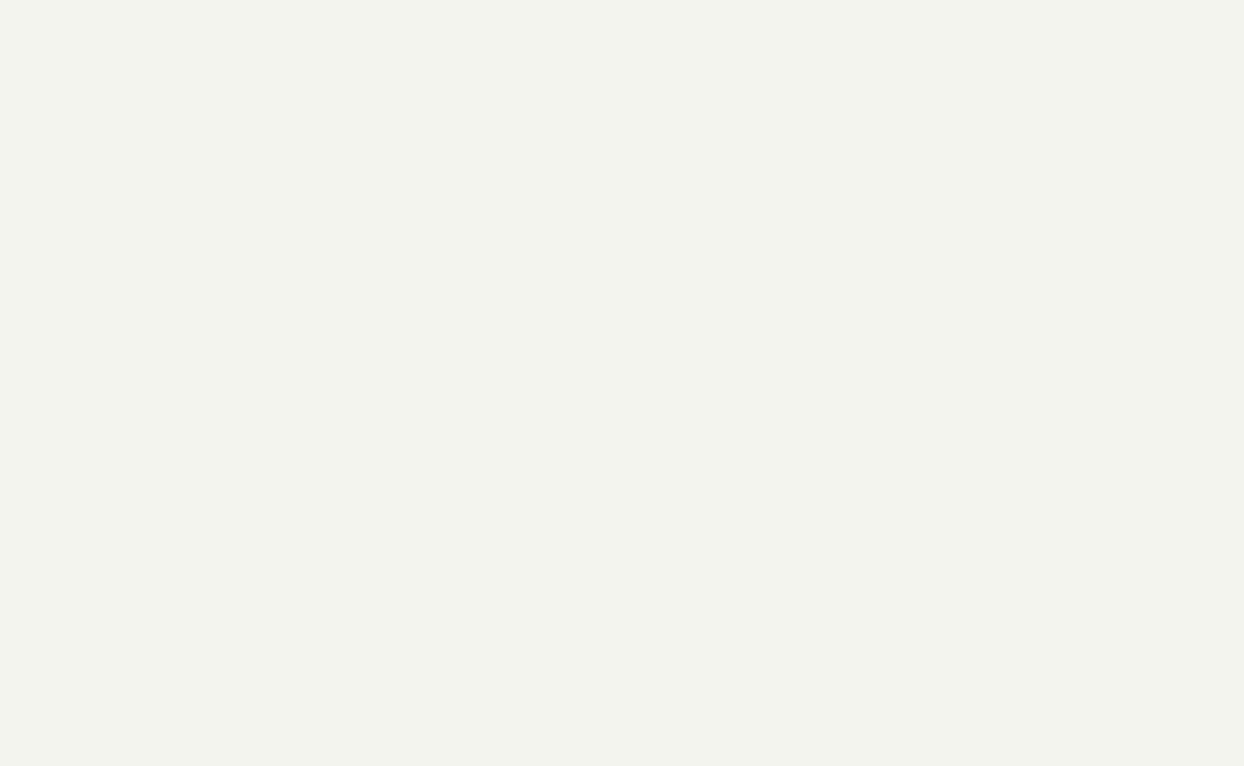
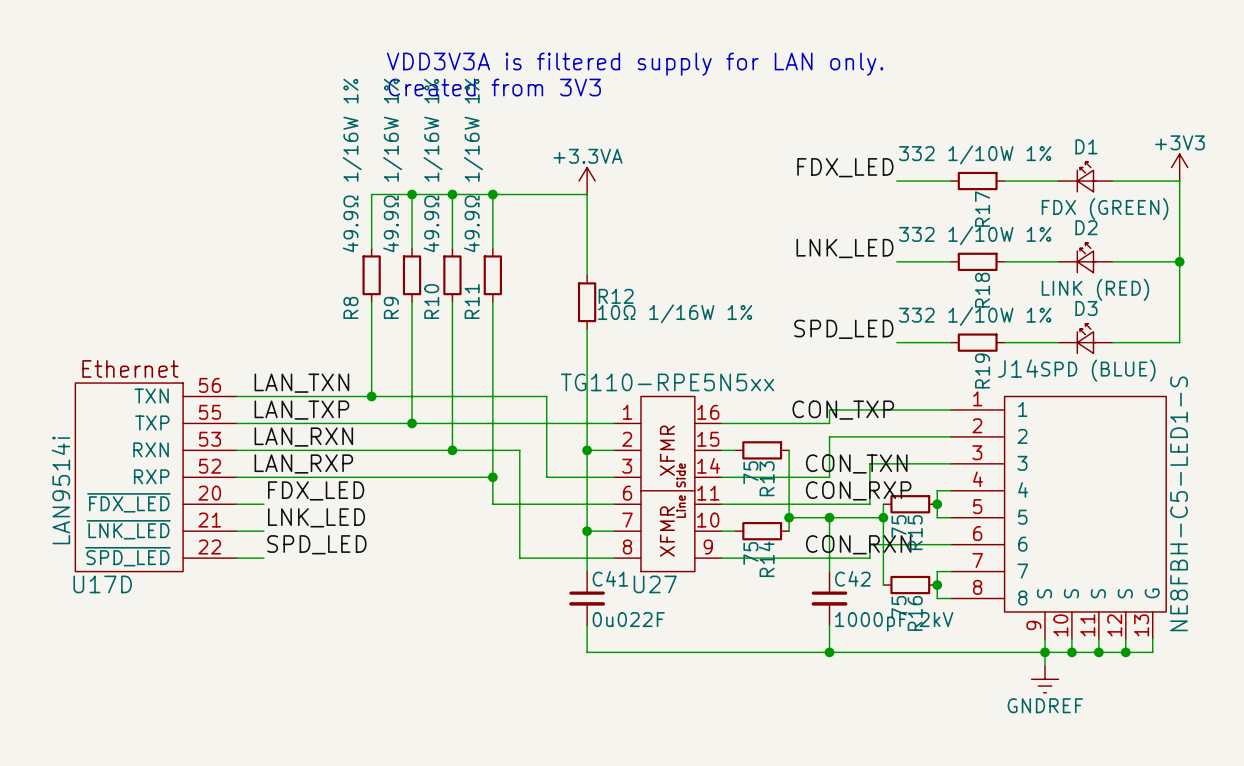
text: none -> VDD3V3A is filtered supply for LAN only. (635, 64)
text: none -> Created from 3V3 (494, 87)
label: none -> FDX_LED (845, 167)
power symbol: none -> +3V3 (1179, 167)
D1: none -> FDX (GREEN) (1085, 176)
power symbol: none -> +3.3VA (587, 181)
wire: none -> (896, 181) (950, 181)
R17: none -> 332 1/10W 1% (977, 181)
wire: none -> (1004, 181) (1058, 181)
wire: none -> (1112, 181) (1179, 181) (1179, 342) (1112, 342)
wire: none -> (412, 194) (412, 248)
junction: none -> (412, 194)
wire: none -> (452, 194) (452, 248)
junction: none -> (452, 194)
wire: none -> (492, 194) (492, 248)
junction: none -> (492, 194)
wire: none -> (371, 248) (371, 194) (587, 194) (587, 275)
label: none -> LNK_LED (845, 248)
D2: none -> LINK (RED) (1085, 257)
wire: none -> (896, 261) (950, 261)
R18: none -> 332 1/10W 1% (977, 261)
wire: none -> (1004, 261) (1058, 261)
wire: none -> (1112, 261) (1179, 261)
junction: none -> (1179, 261)
R8: none -> 49.9Ω 1/16W 1% (371, 275)
R9: none -> 49.9Ω 1/16W 1% (412, 275)
R10: none -> 49.9Ω 1/16W 1% (452, 275)
R11: none -> 49.9Ω 1/16W 1% (492, 275)
wire: none -> (371, 302) (371, 396)
wire: none -> (412, 302) (412, 423)
wire: none -> (452, 302) (452, 450)
wire: none -> (492, 302) (492, 504) (614, 504)
R12: none -> 10Ω 1/16W 1% (587, 302)
wire: none -> (587, 329) (587, 571)
label: none -> SPD_LED (843, 329)
D3: none -> SPD (BLUE) (1085, 338)
wire: none -> (896, 342) (950, 342)
R19: none -> 332 1/10W 1% (977, 342)
wire: none -> (1004, 342) (1058, 342)
label: none -> LAN_TXN (301, 383)
wire: none -> (236, 396) (546, 396) (546, 477) (614, 477)
junction: none -> (371, 396)
wire: none -> (950, 409) (829, 409) (829, 423) (721, 423)
label: none -> LAN_TXP (301, 410)
label: none -> CON_TXP (843, 410)
wire: none -> (236, 423) (614, 423)
junction: none -> (412, 423)
wire: none -> (950, 436) (829, 436) (829, 477) (721, 477)
label: none -> LAN_RXN (303, 437)
wire: none -> (236, 450) (519, 450) (519, 558) (614, 558)
junction: none -> (452, 450)
wire: none -> (587, 450) (614, 450)
junction: none -> (587, 450)
wire: none -> (721, 450) (735, 450)
R13: none -> 75 (762, 450)
wire: none -> (789, 450) (789, 531)
label: none -> LAN_RXP (303, 463)
label: none -> CON_TXN (856, 463)
wire: none -> (950, 463) (869, 463) (869, 504) (721, 504)
U17D: none -> LAN9514i (156, 477)
wire: none -> (236, 477) (492, 477)
junction: none -> (492, 477)
U27: none -> TG110-RPE5N5xx (667, 484)
label: none -> FDX_LED (316, 490)
label: none -> CON_RXP (858, 490)
wire: none -> (950, 490) (937, 490) (937, 517) (950, 517)
wire: none -> (236, 504) (263, 504)
wire: none -> (883, 504) (883, 585)
R15: none -> 75 (910, 504)
junction: none -> (937, 504)
label: none -> LNK_LED (316, 517)
wire: none -> (789, 517) (883, 517)
junction: none -> (789, 517)
wire: none -> (829, 517) (829, 571)
junction: none -> (829, 517)
junction: none -> (883, 517)
J14: none -> NE8FBH-C5-LED1-S (1058, 517)
wire: none -> (236, 531) (263, 531)
wire: none -> (587, 531) (614, 531)
junction: none -> (587, 531)
wire: none -> (721, 531) (735, 531)
R14: none -> 75 (762, 531)
label: none -> SPD_LED (316, 544)
label: none -> CON_RXN (858, 544)
wire: none -> (950, 544) (869, 544) (869, 558) (721, 558)
wire: none -> (236, 558) (263, 558)
wire: none -> (950, 571) (937, 571) (937, 598) (950, 598)
R16: none -> 75 (910, 585)
junction: none -> (937, 585)
C41: none -> 0u022F (587, 598)
C42: none -> 1000pF 2kV (829, 598)
wire: none -> (587, 625) (587, 652) (1152, 652) (1152, 638)
wire: none -> (829, 625) (829, 652)
wire: none -> (1044, 638) (1044, 665)
wire: none -> (1071, 638) (1071, 652)
wire: none -> (1098, 638) (1098, 652)
wire: none -> (1125, 638) (1125, 652)
junction: none -> (829, 652)
junction: none -> (1044, 652)
junction: none -> (1071, 652)
junction: none -> (1098, 652)
junction: none -> (1125, 652)
power symbol: none -> GNDREF (1044, 679)

